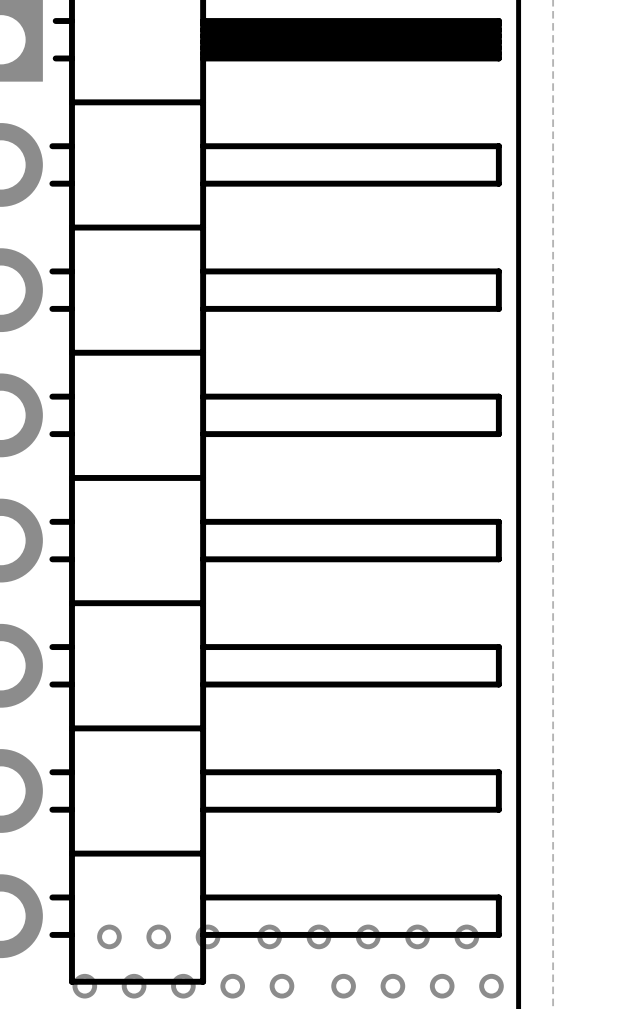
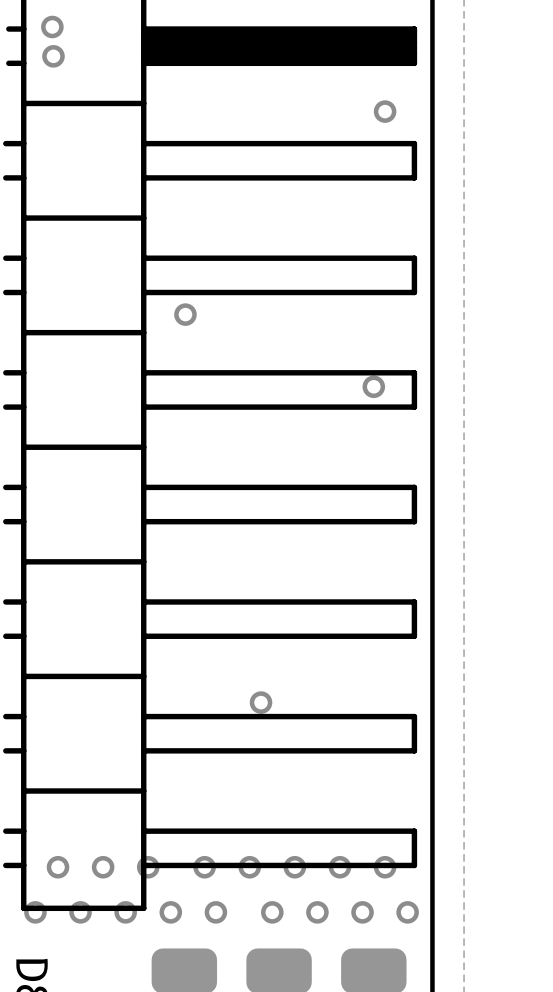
via: none -> (52, 27)
via: none -> (53, 56)
via: none -> (385, 111)
via: none -> (185, 314)
via: none -> (373, 386)
via: none -> (261, 702)

